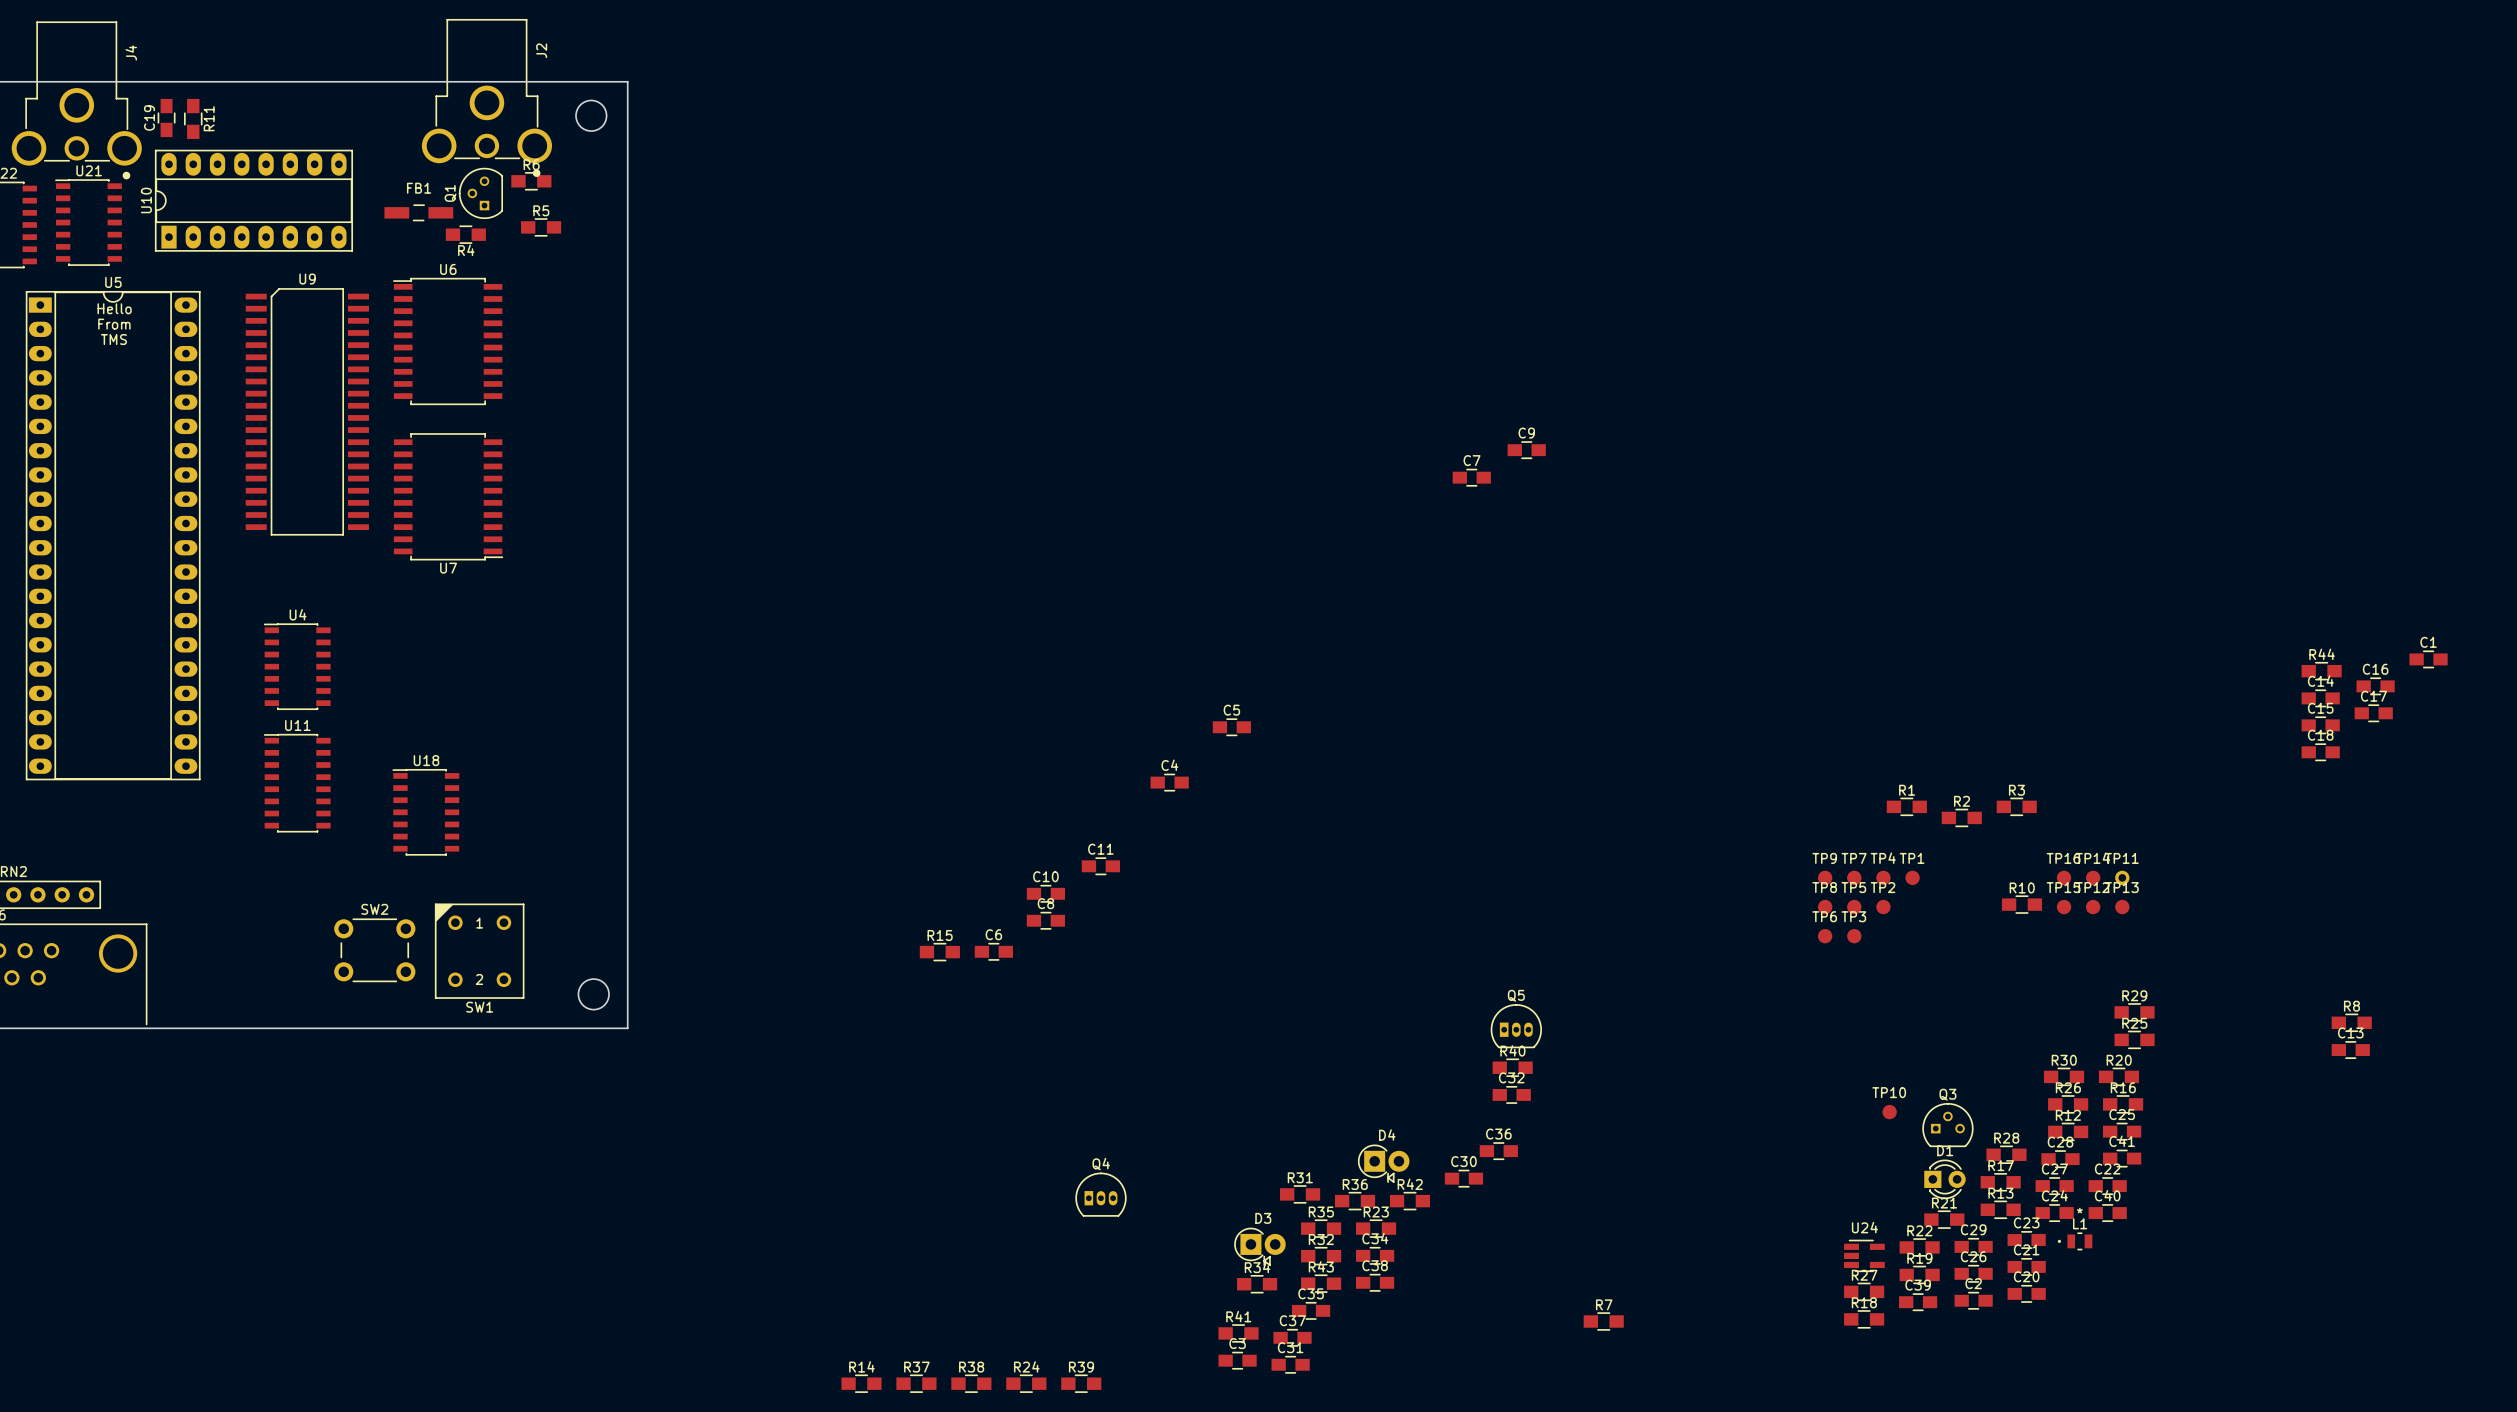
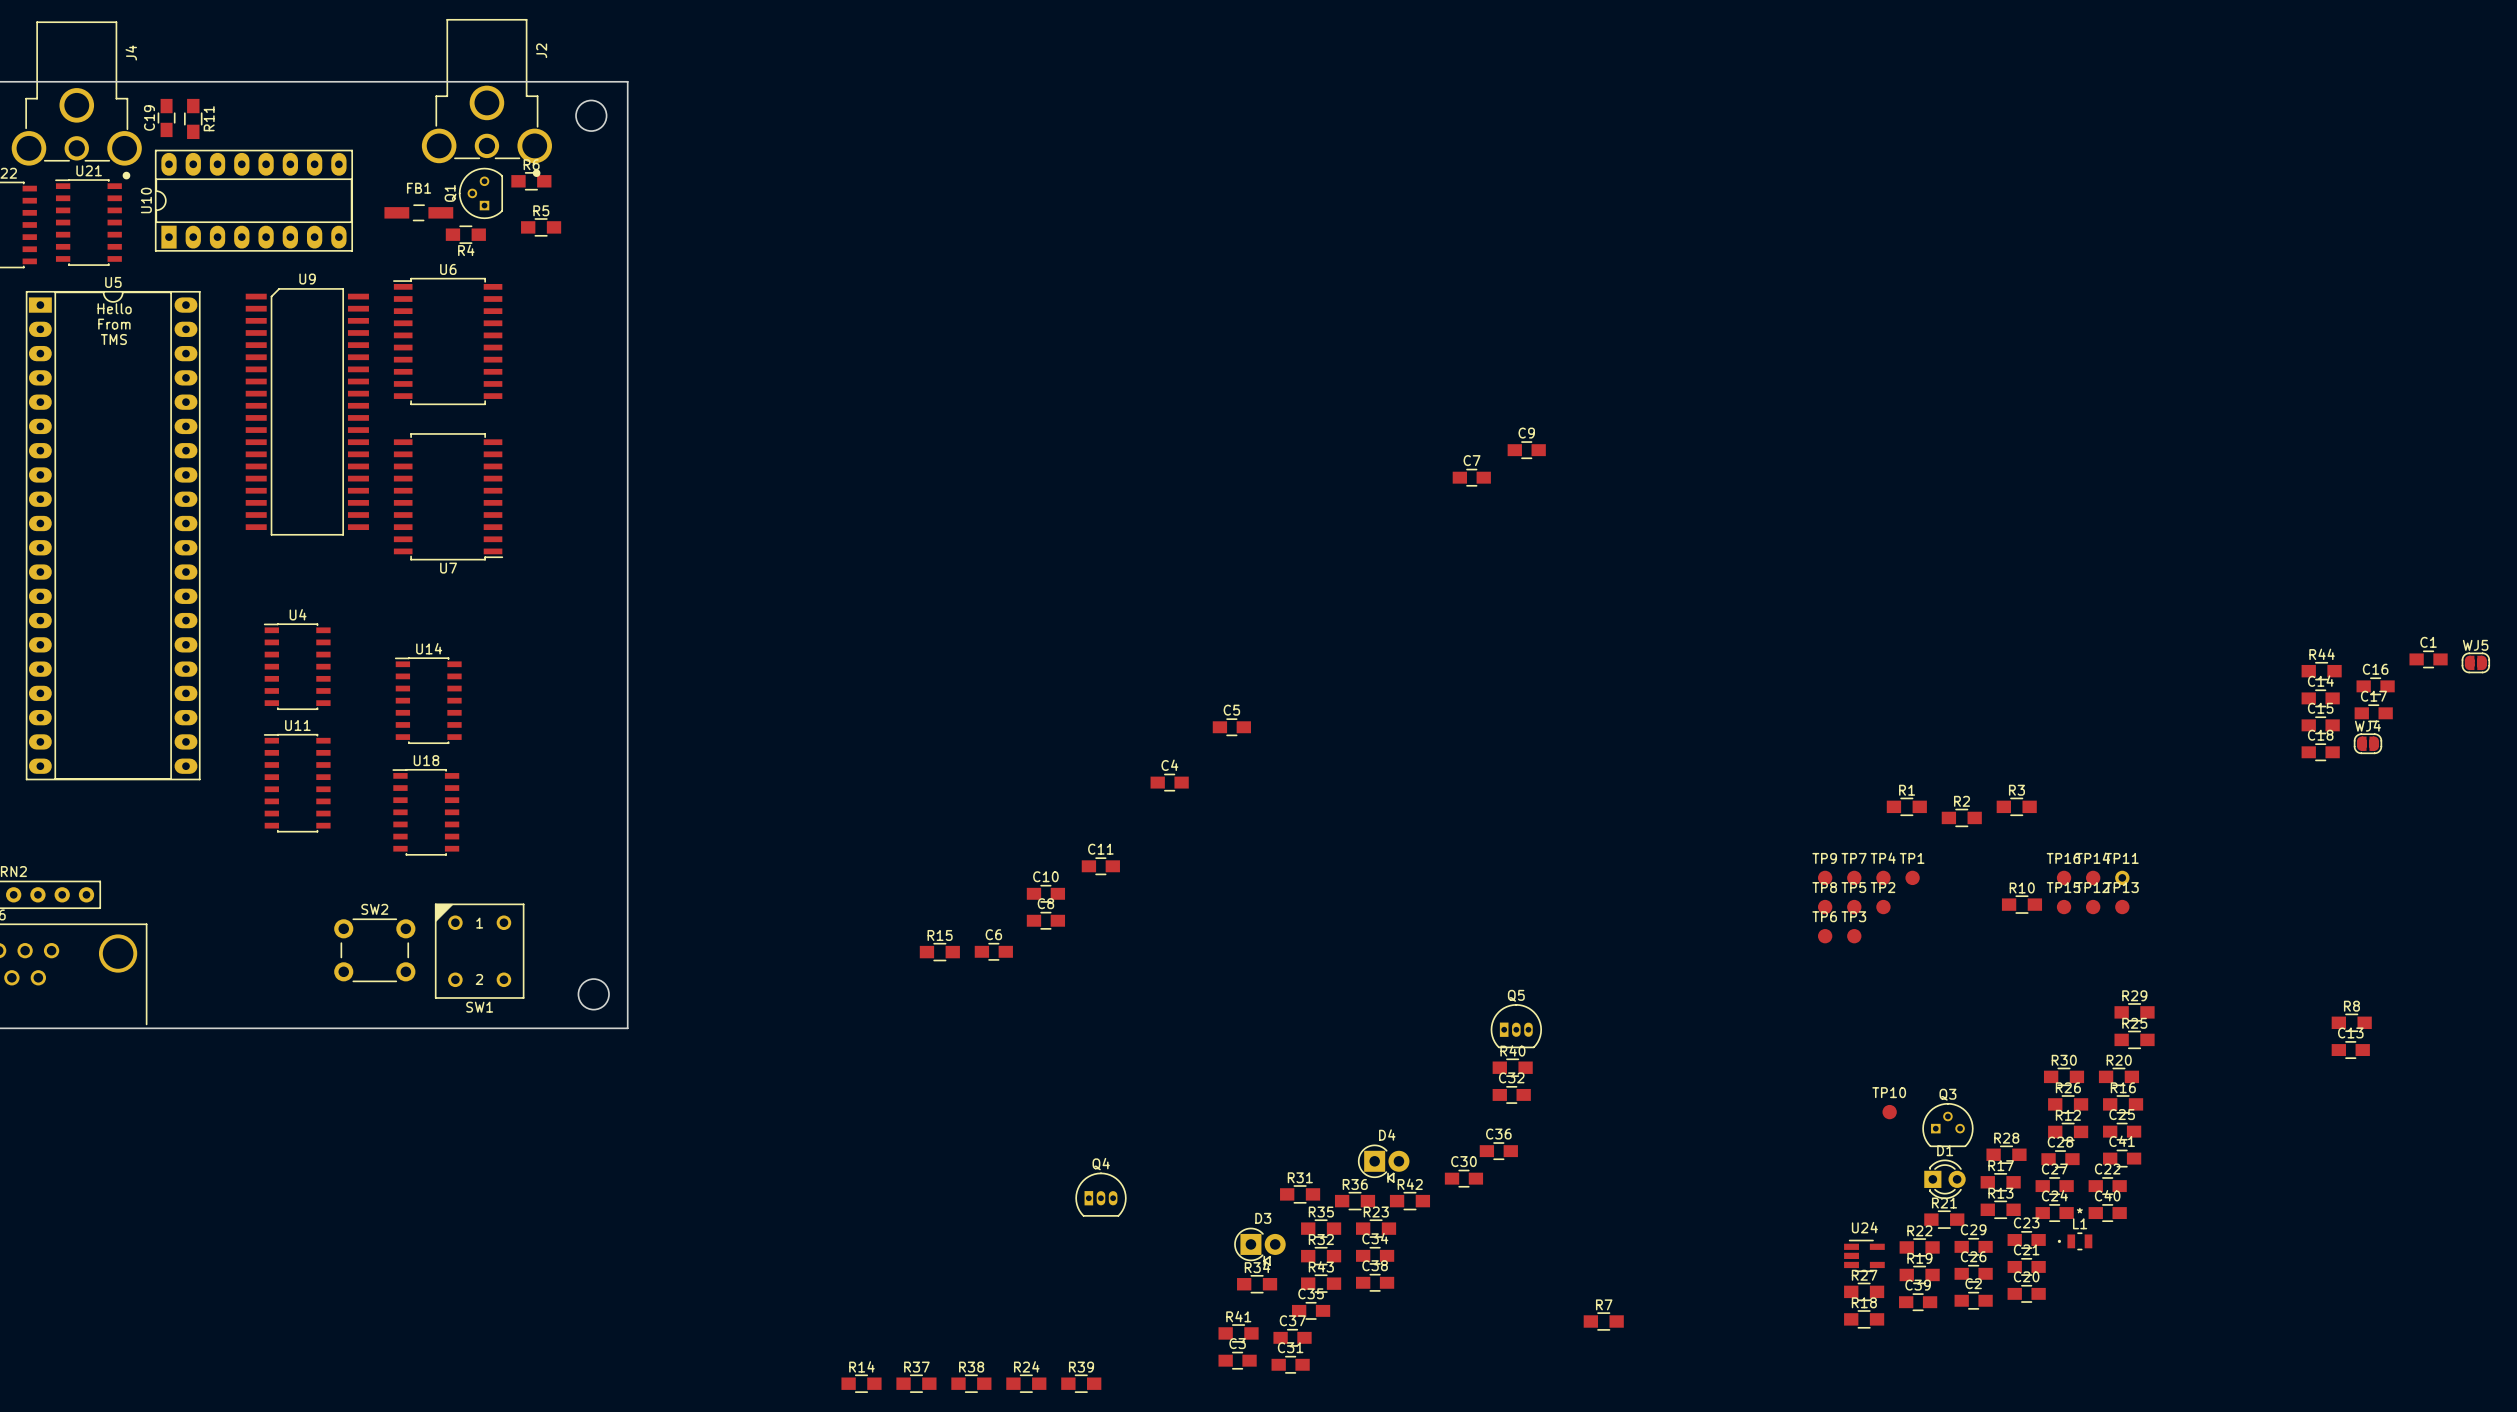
WJ5: none -> (2475, 662)
U14: none -> (428, 700)
WJ4: none -> (2367, 743)

